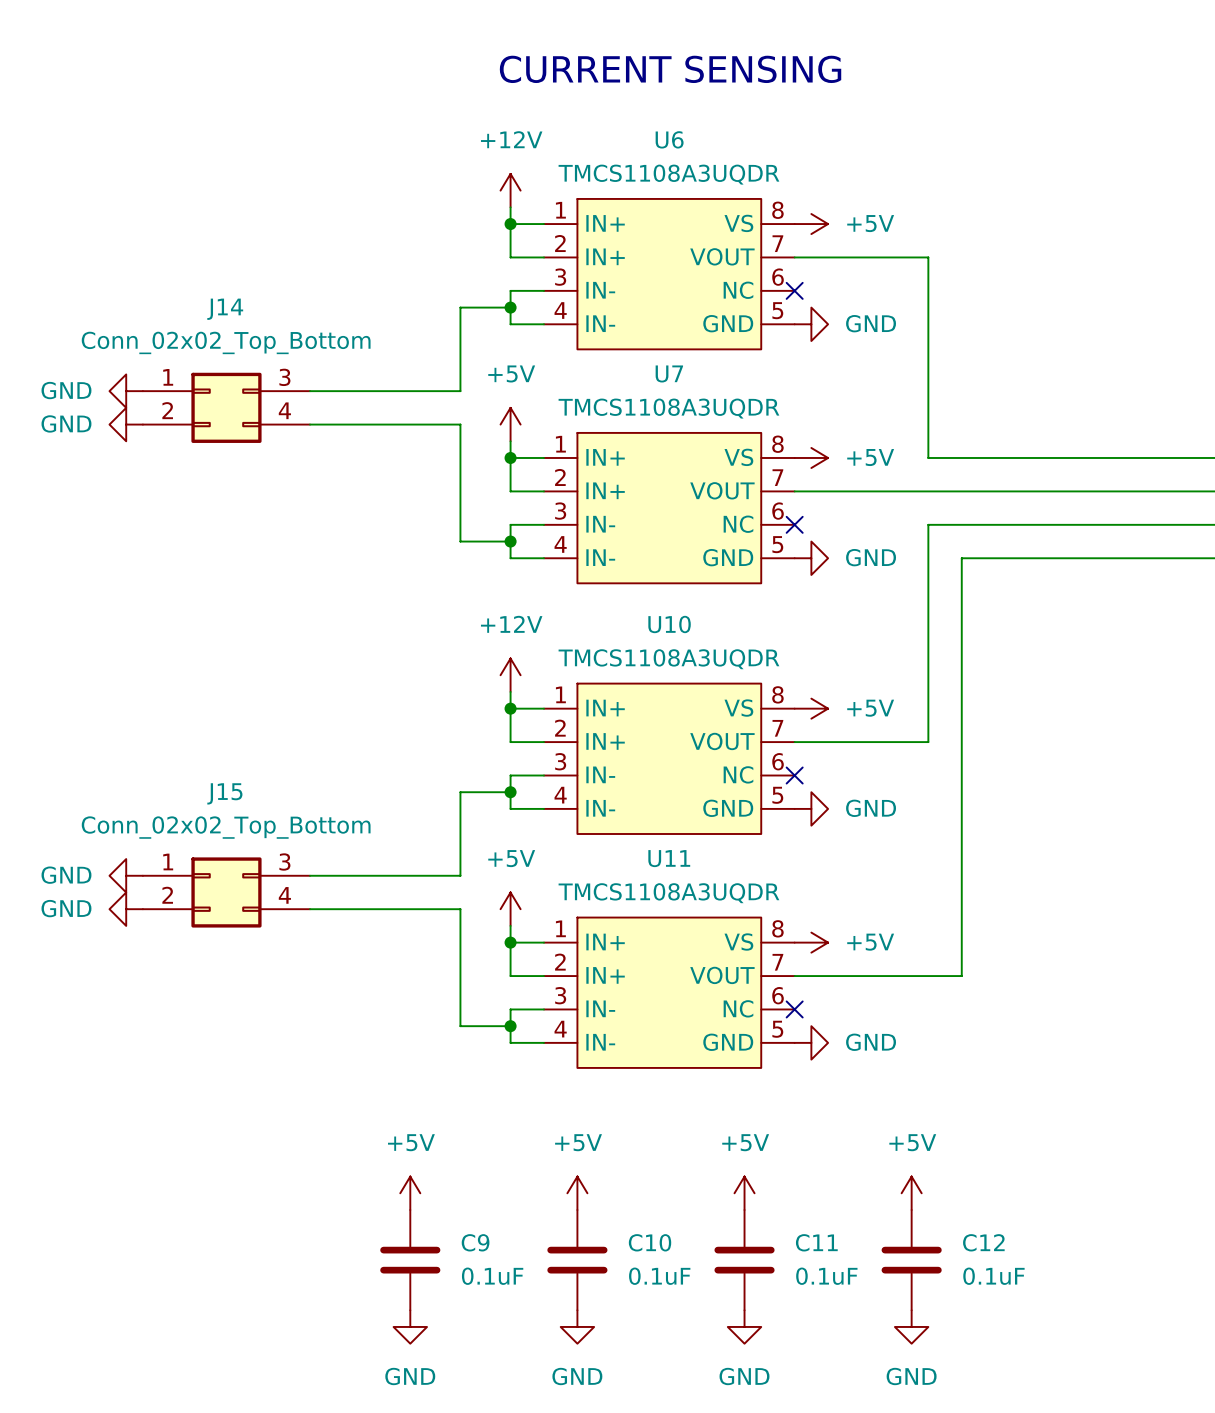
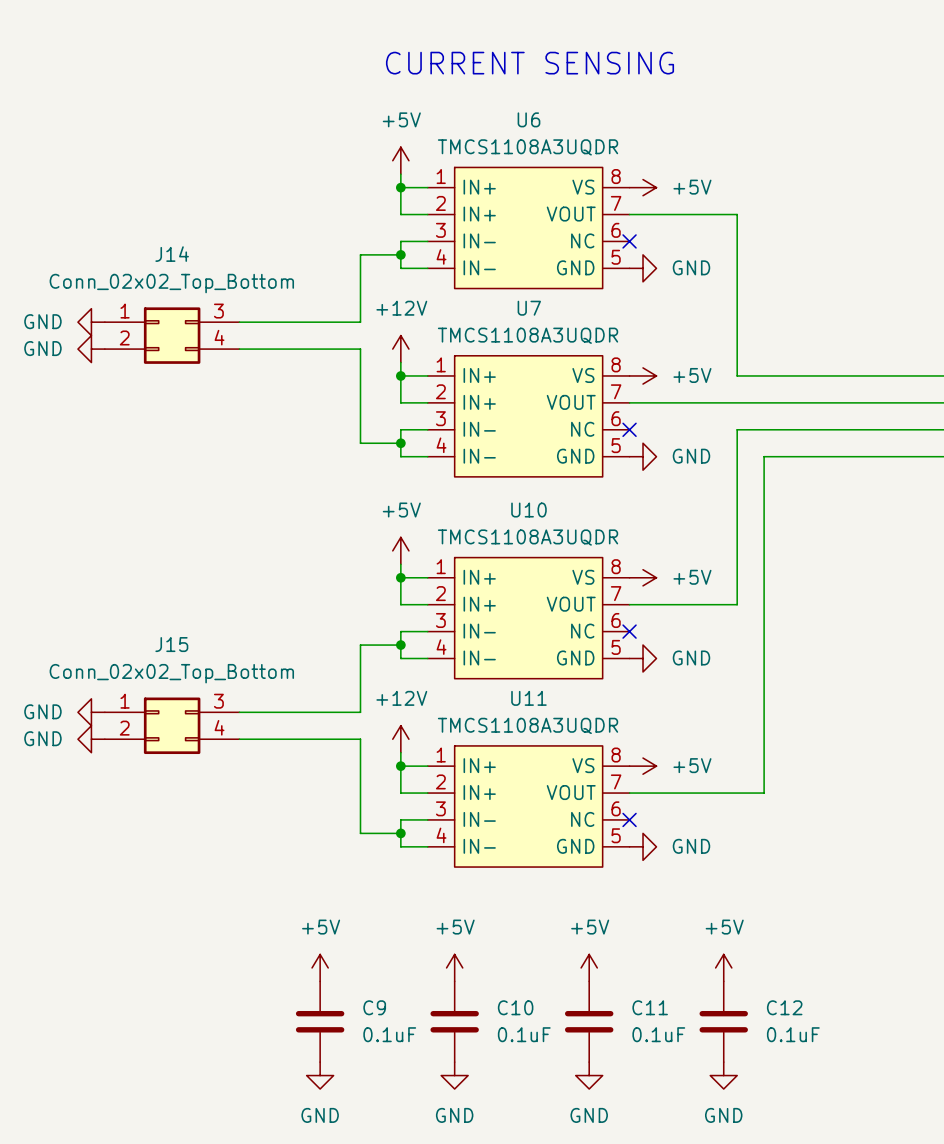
power symbol: +12V (510, 190) -> +5V (400, 160)
power symbol: +5V (510, 424) -> +12V (400, 349)
power symbol: +12V (510, 675) -> +5V (400, 550)
power symbol: +5V (510, 909) -> +12V (400, 739)

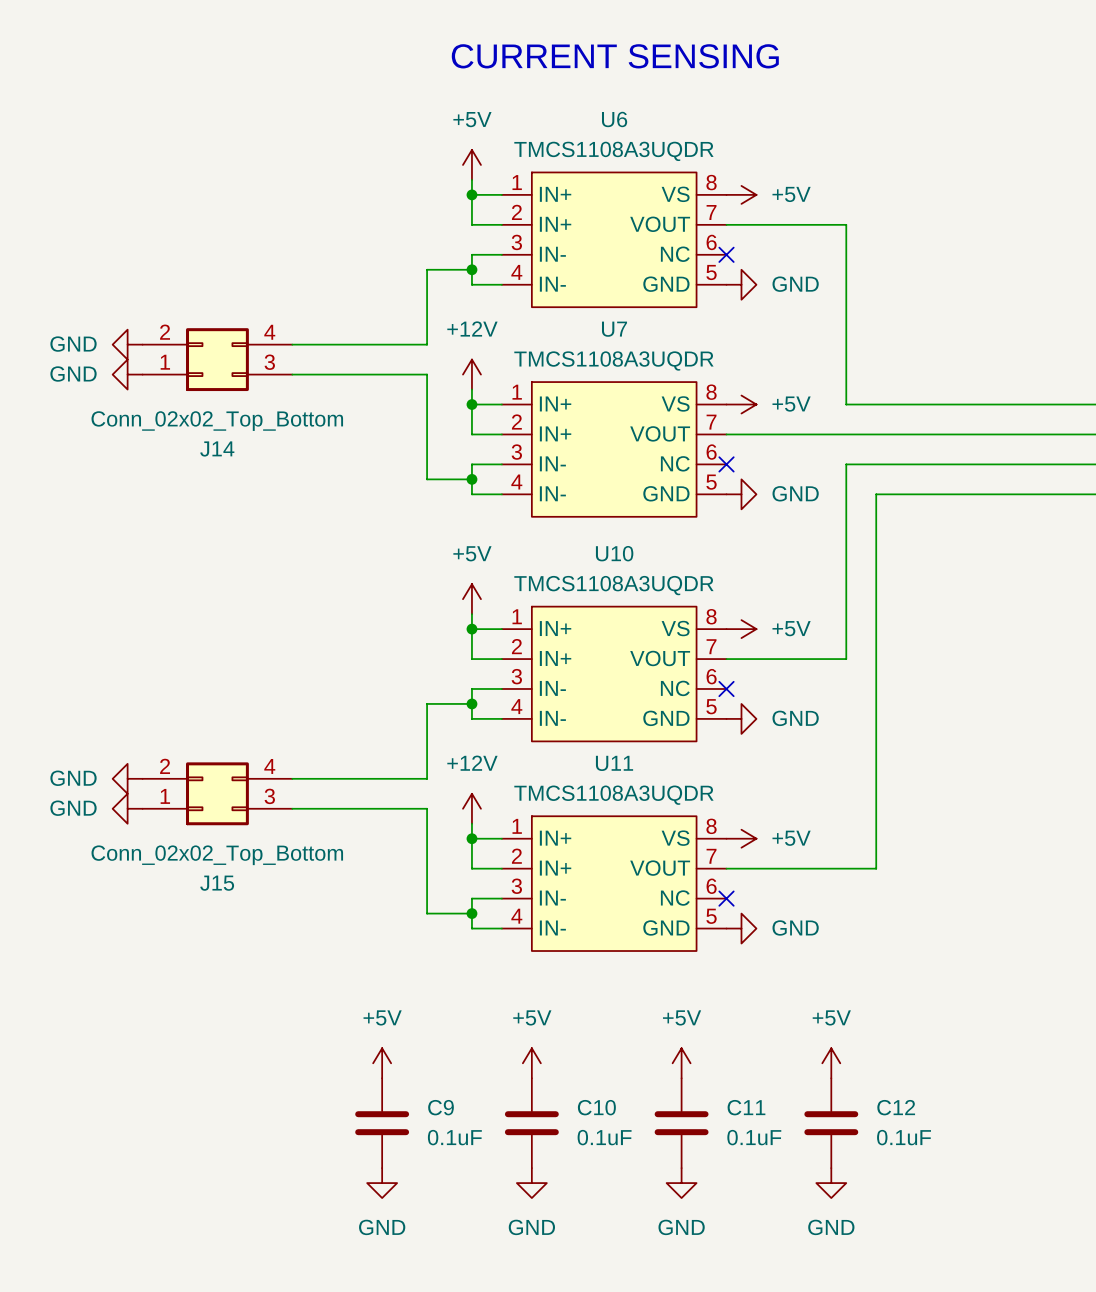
J14 flip: as is (172, 335) -> up-down (217, 359)
J15 flip: as is (172, 725) -> up-down (217, 793)

